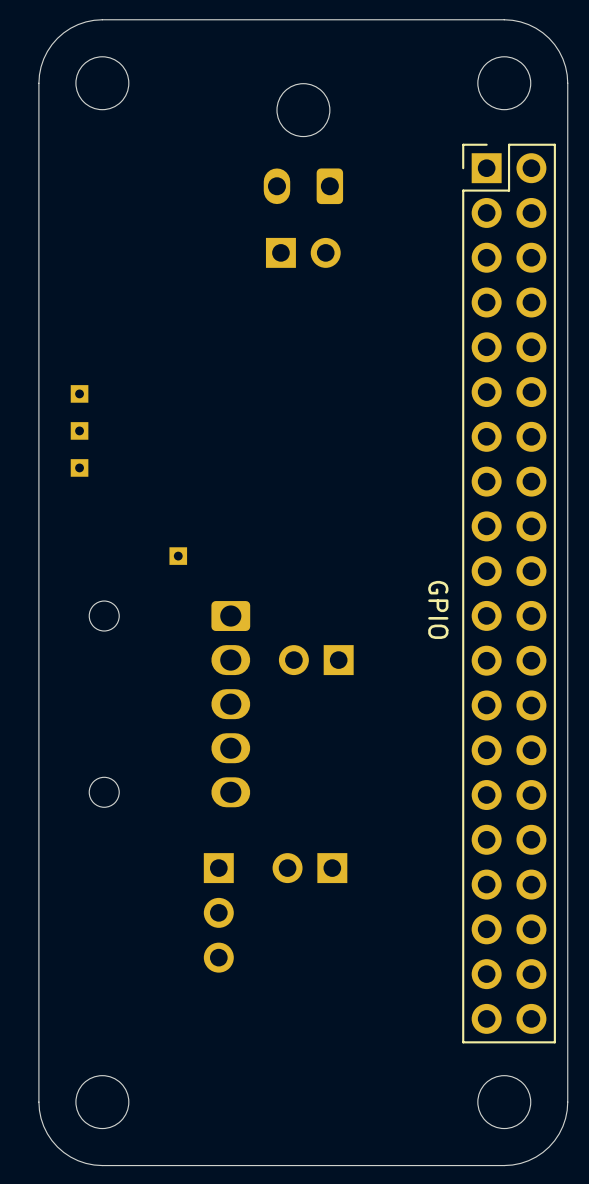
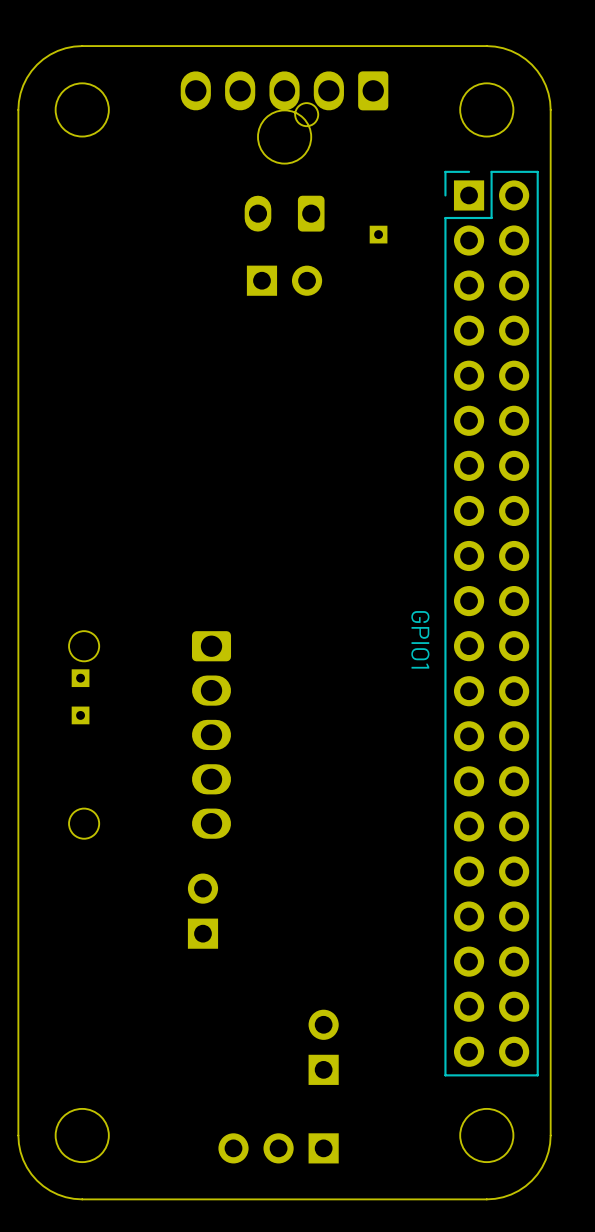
part: none -> (284, 98)
part: none -> (378, 234)
part: (79, 393) -> none
part: (79, 430) -> none
part: (79, 467) -> none
part: (178, 556) -> none
GPIO name: GPIO (438, 609) -> GPIO1 (420, 639)
part: none -> (80, 678)
part: (316, 660) -> none
part: none -> (80, 715)
part: (309, 868) -> none
part: none -> (202, 911)
part rotation: 0° (218, 912) -> 90° clockwise (278, 1148)
part position: (218, 912) -> (278, 1148)
part: none -> (323, 1047)

